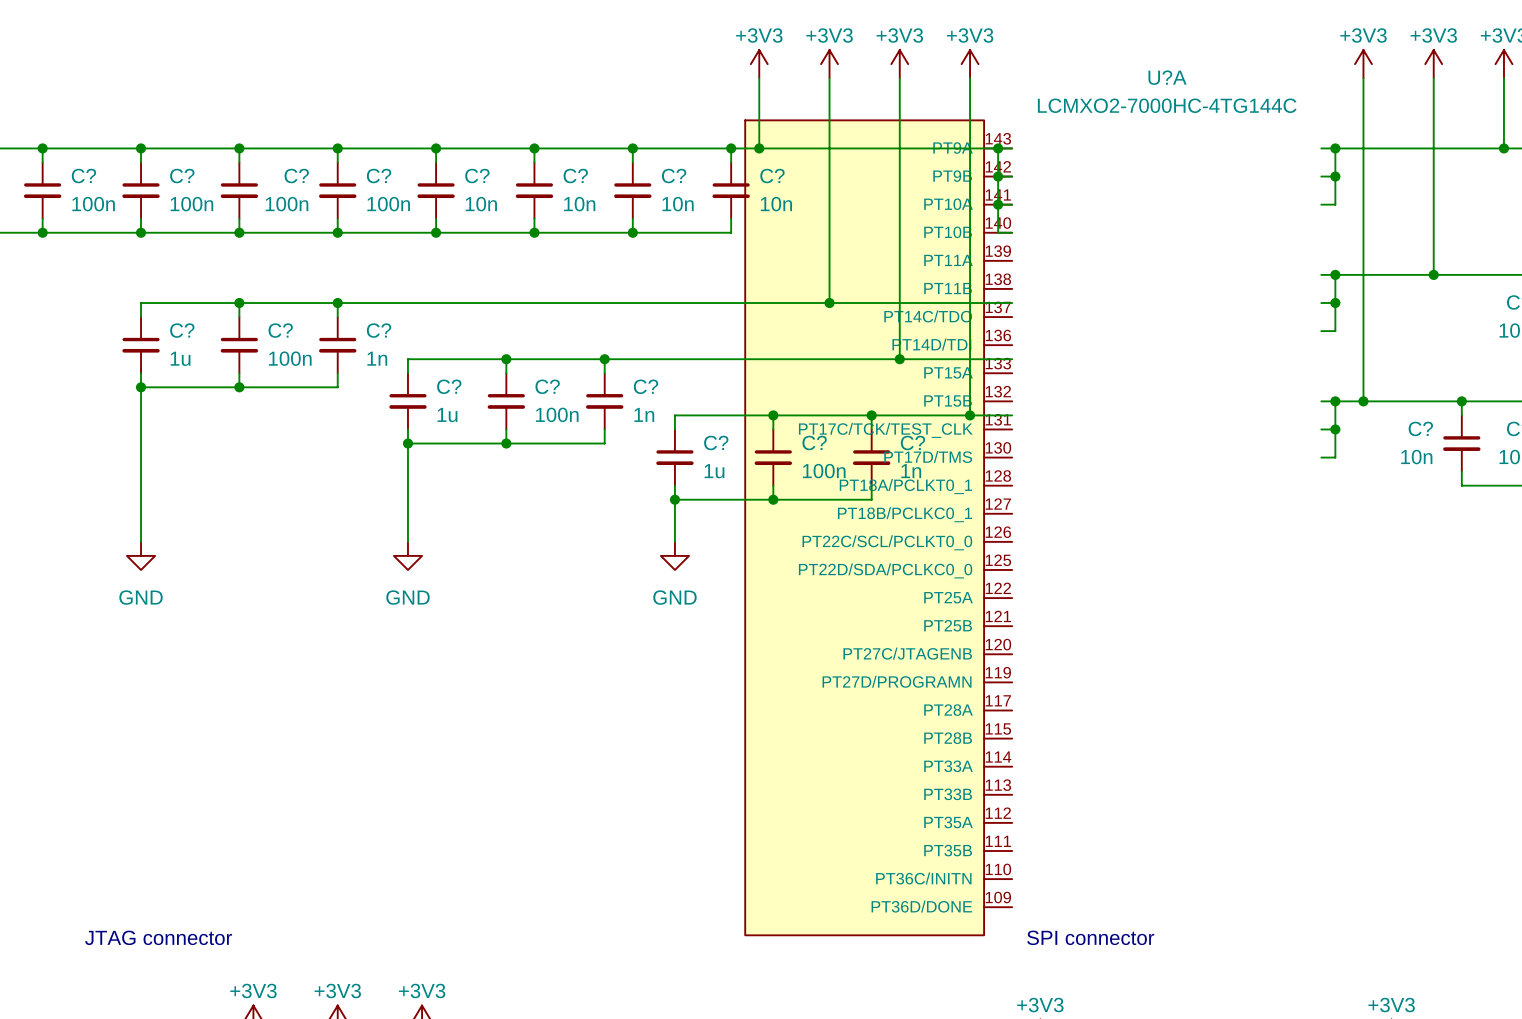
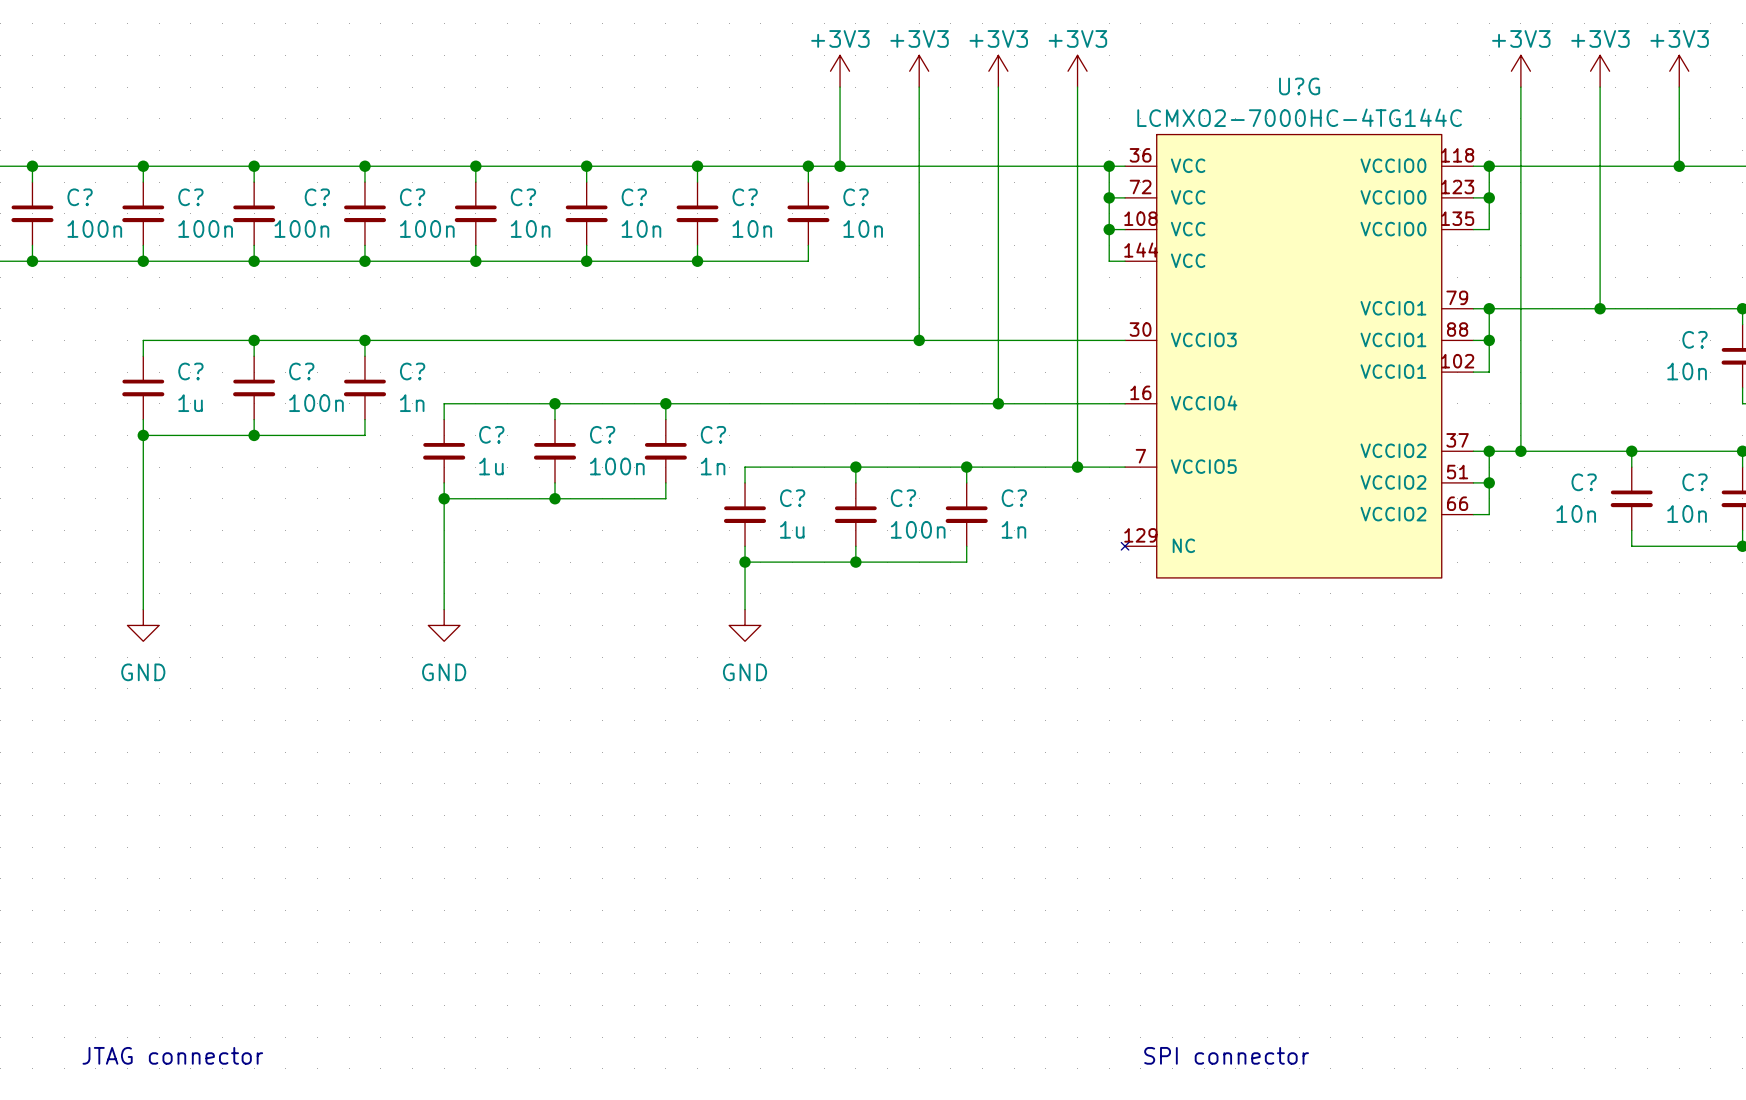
U?G: none -> LCMXO2-7000HC-4TG144C (1297, 356)
U?A: LCMXO2-7000HC-4TG144C (878, 527) -> none

